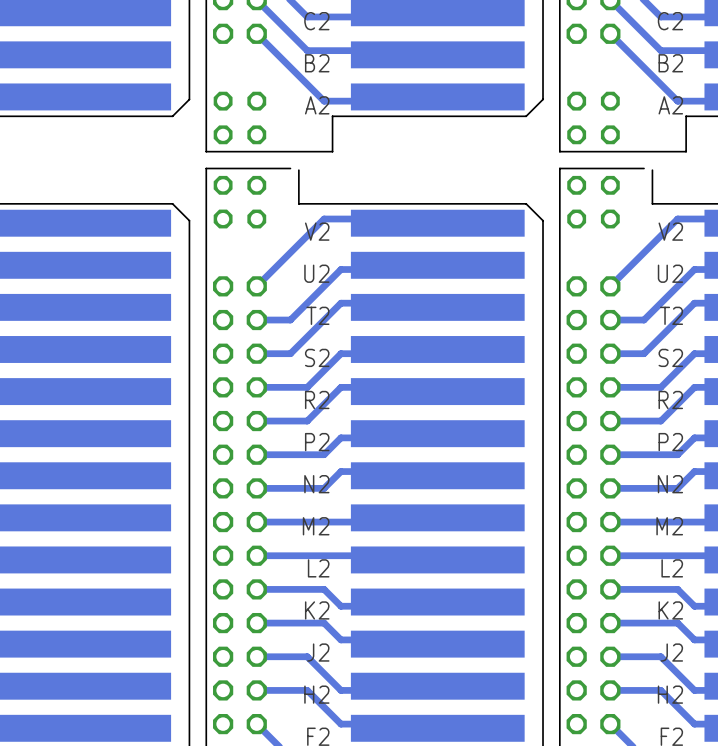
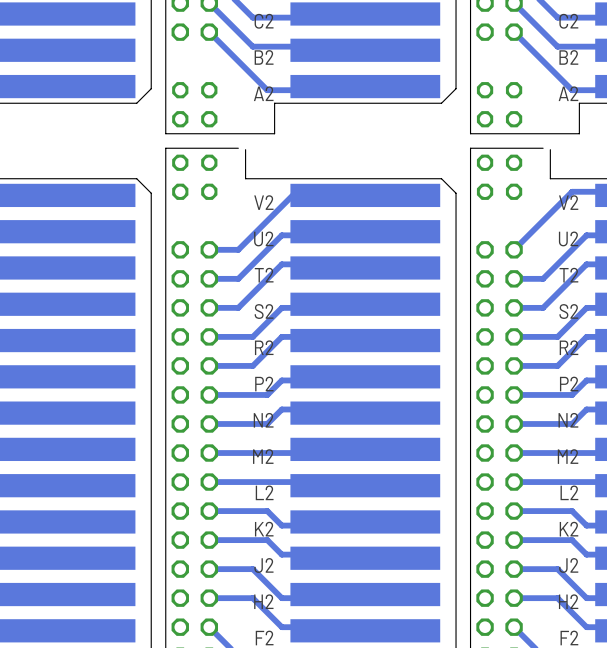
track: (437, 223) (425, 219) (324, 219) (256, 286) -> (365, 195) (296, 191) (238, 249) (209, 249)

